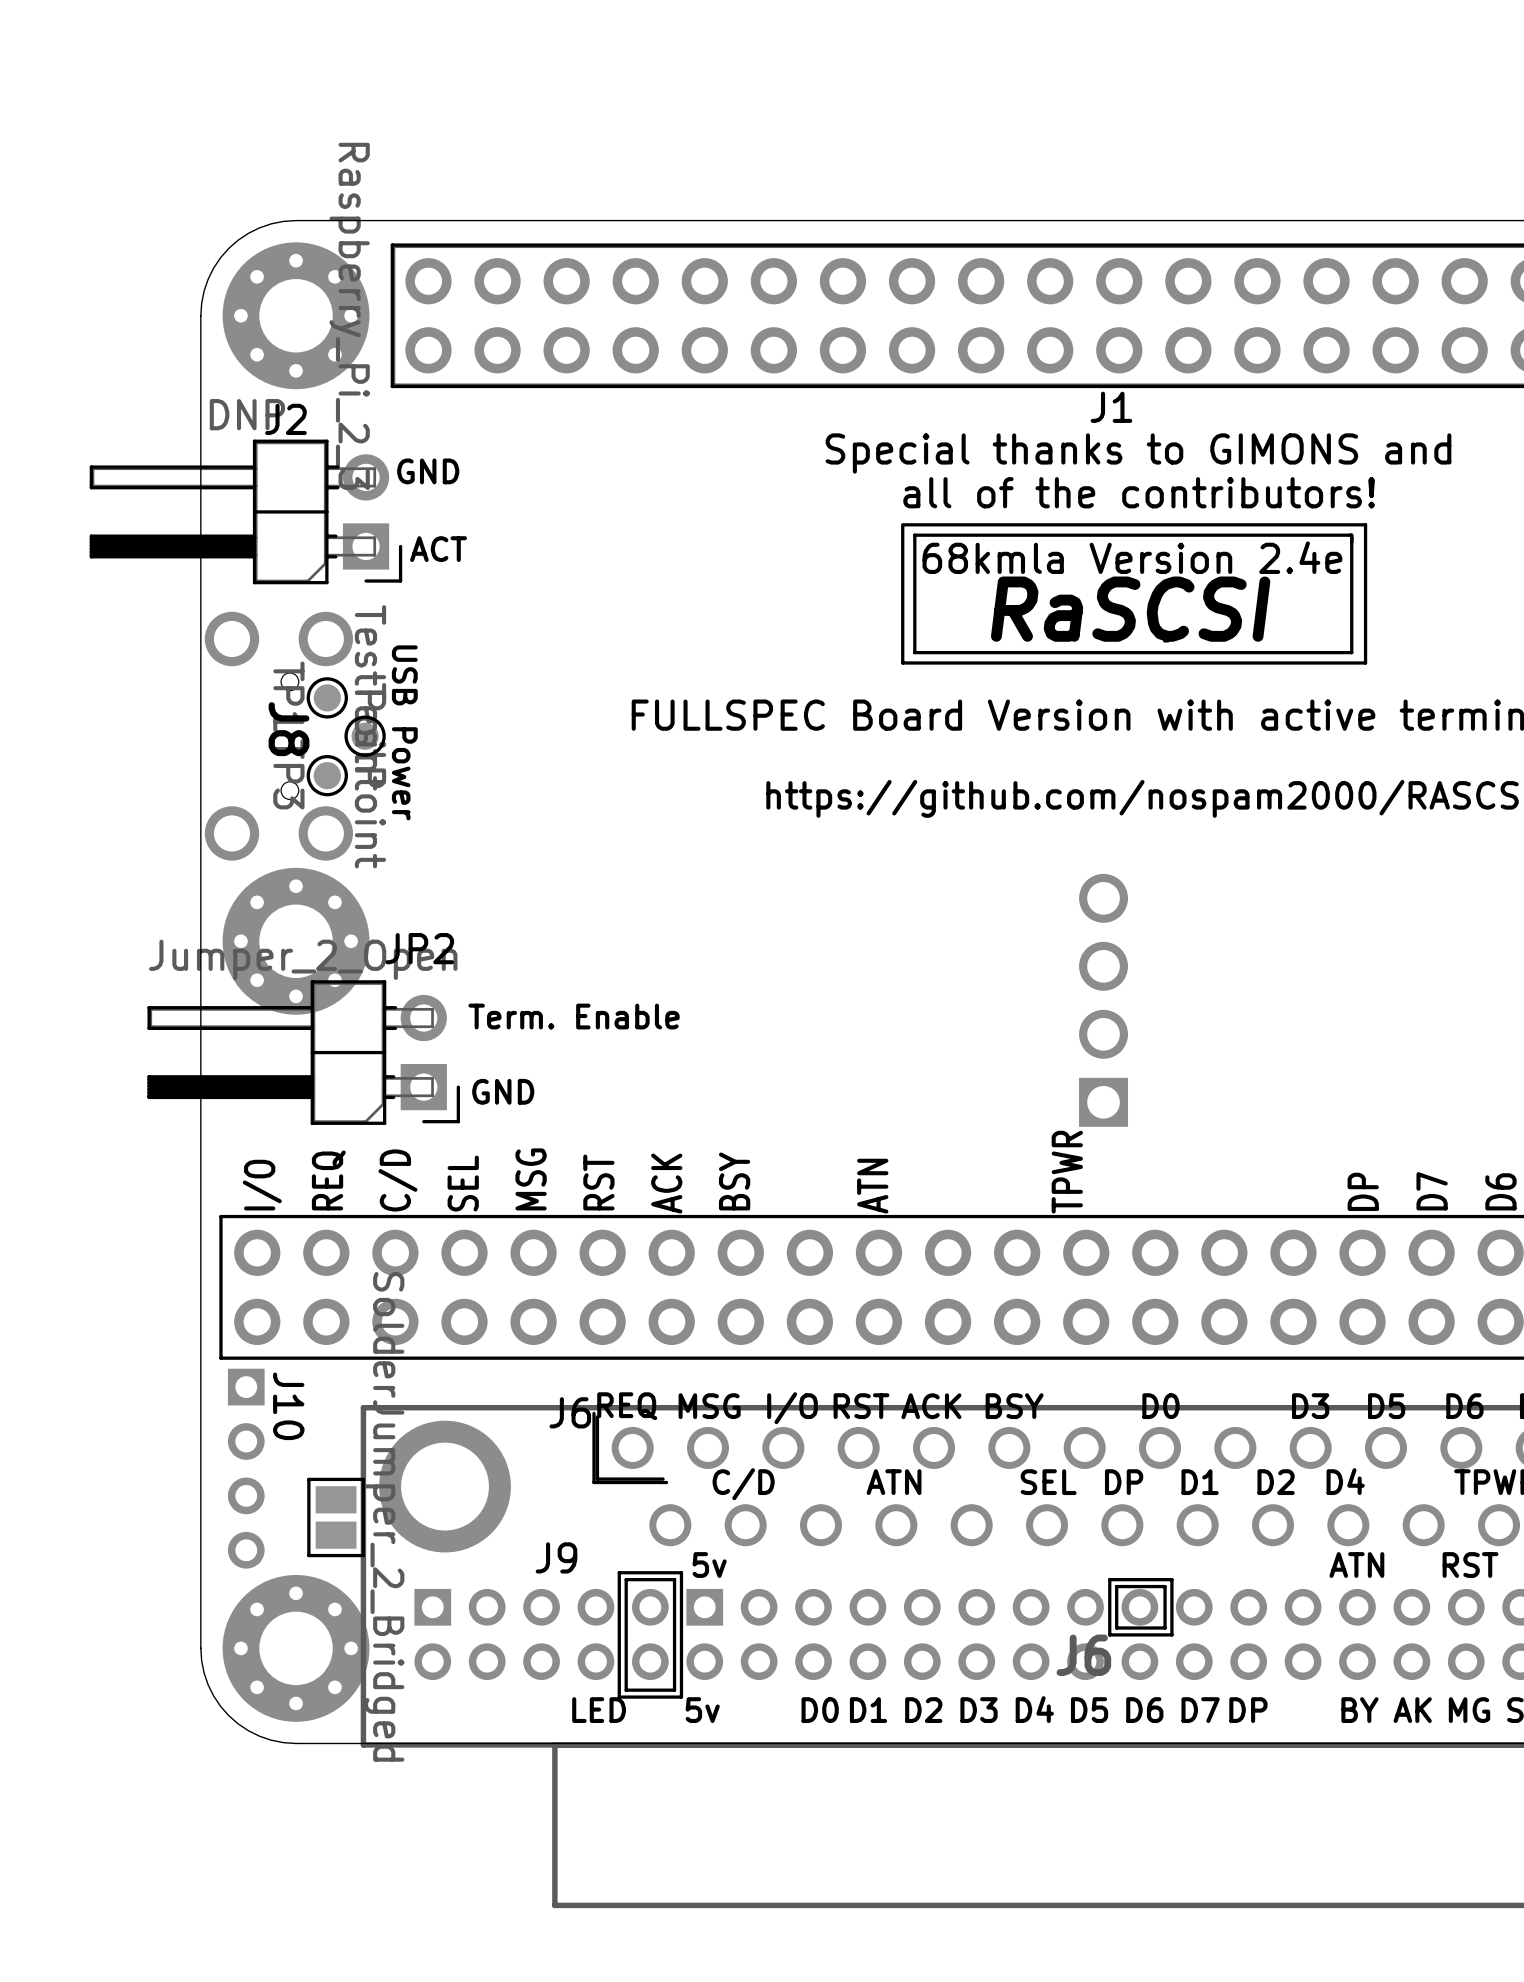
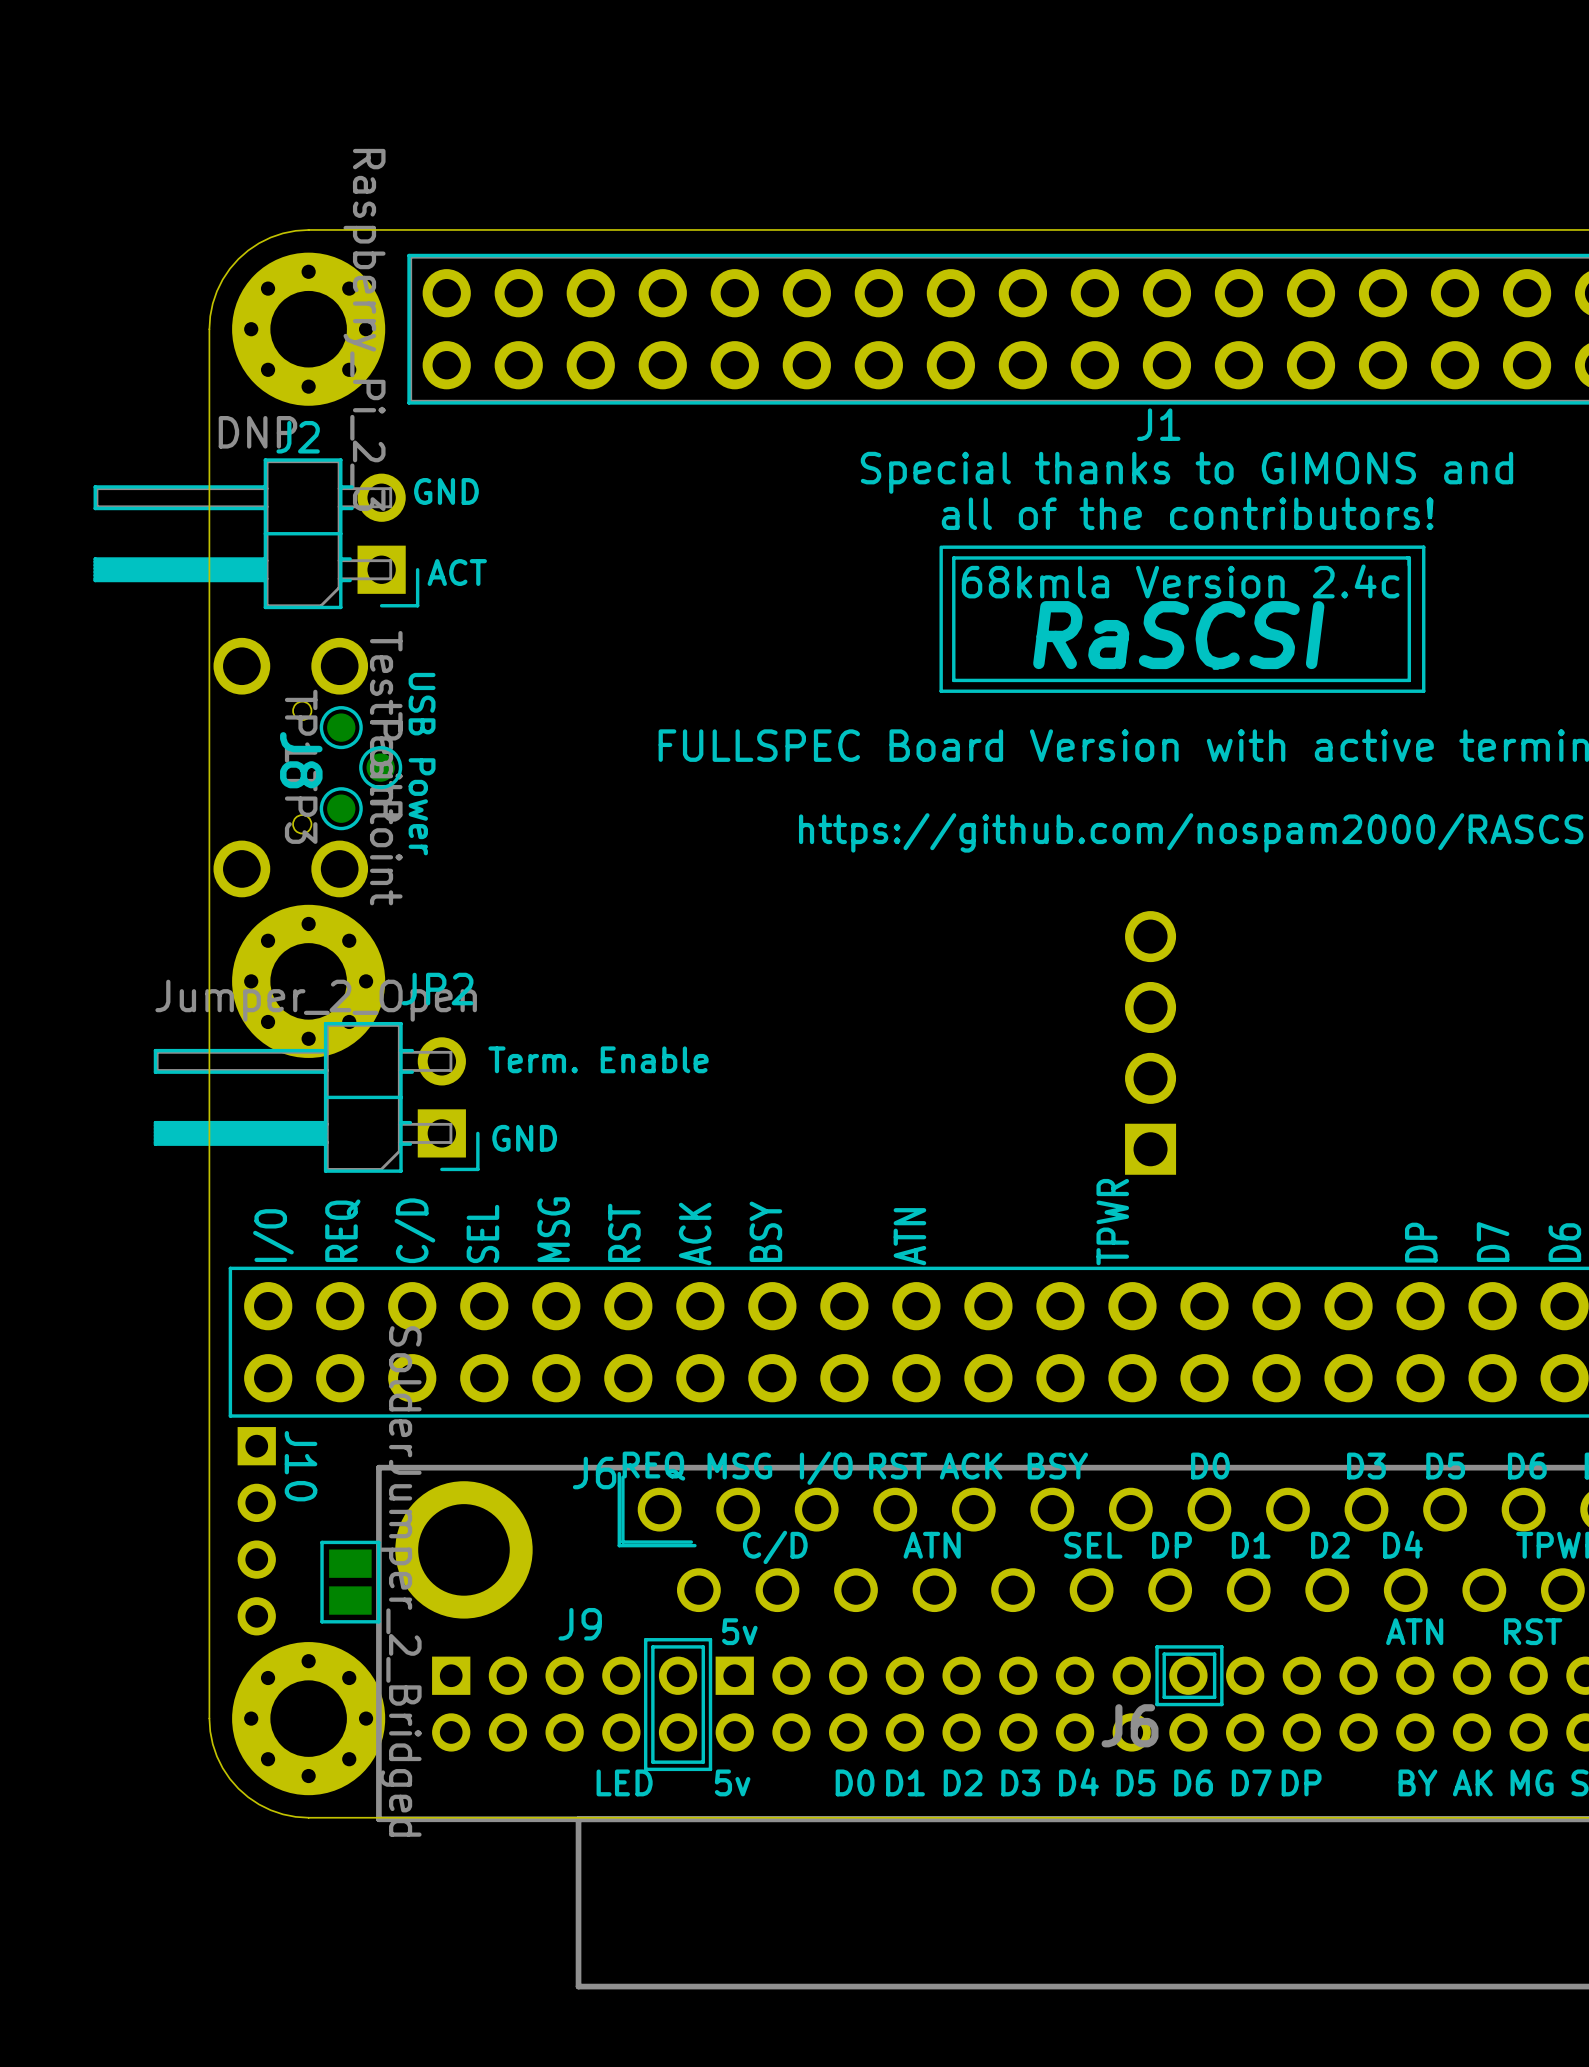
text: 68kmla Version 2.4e (1132, 557) -> 68kmla Version 2.4c (1180, 581)

